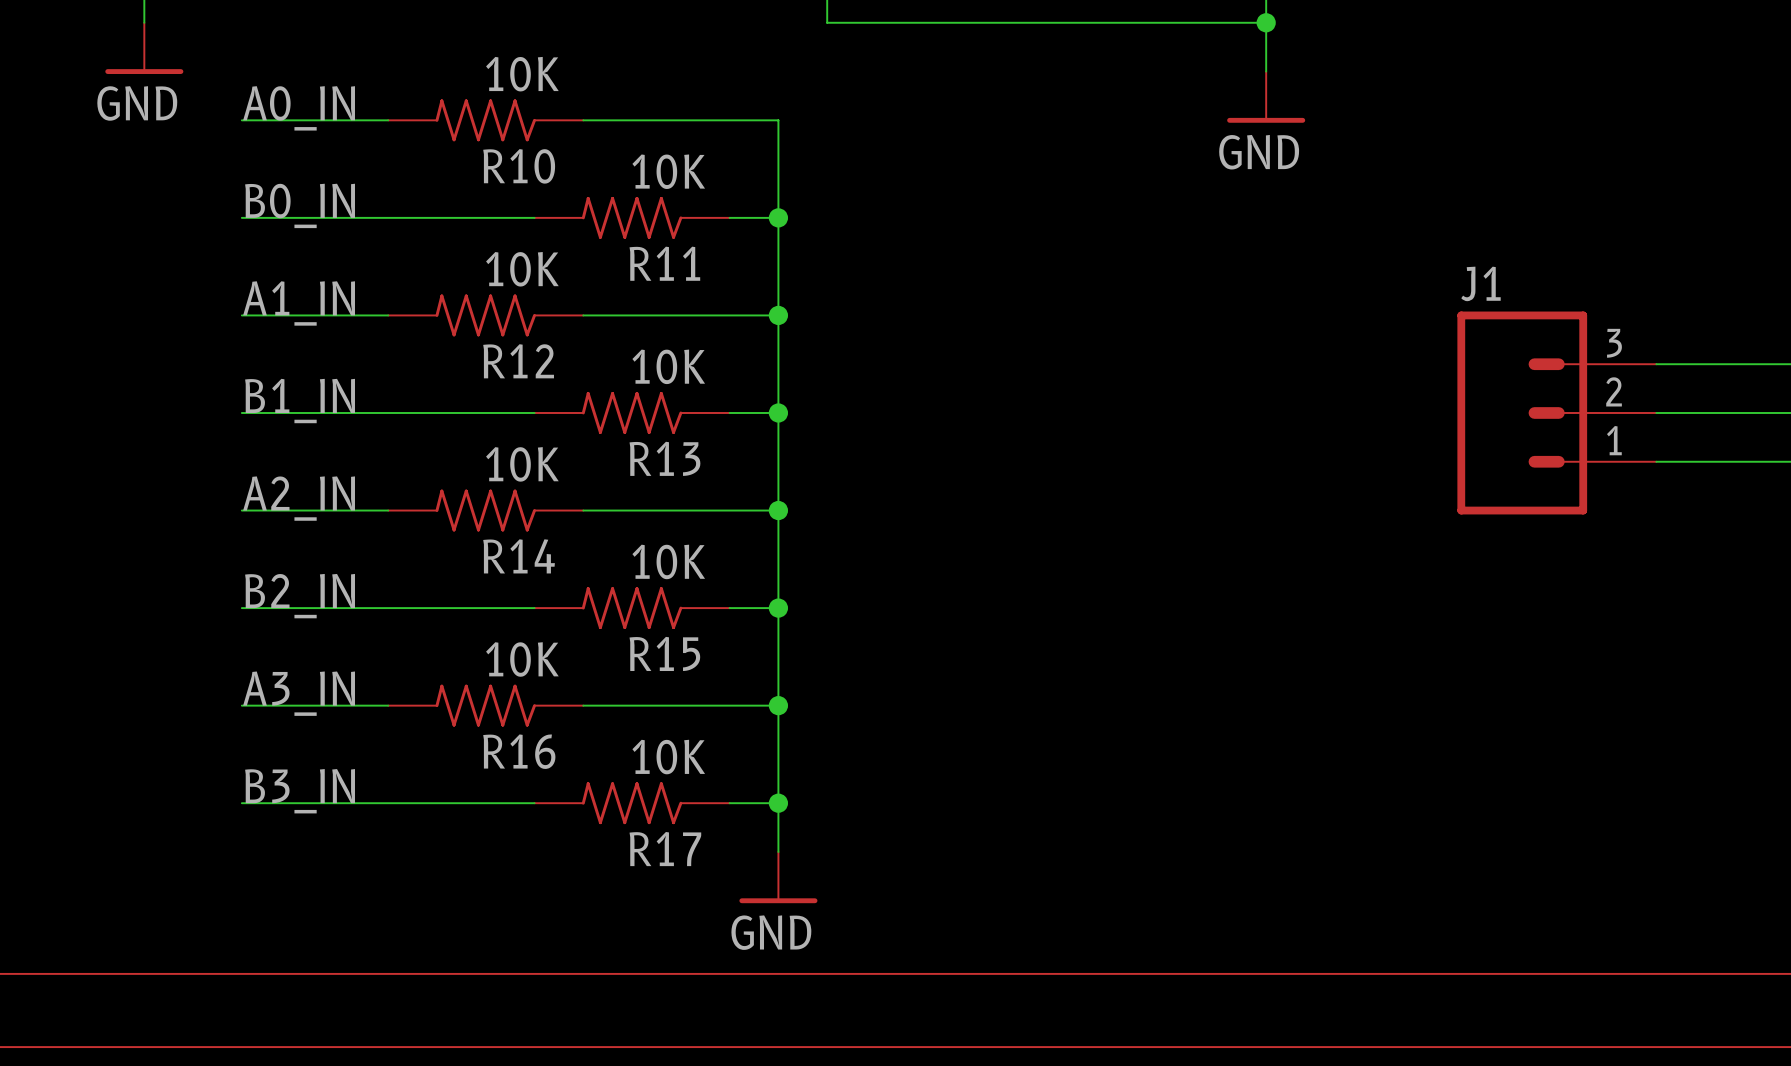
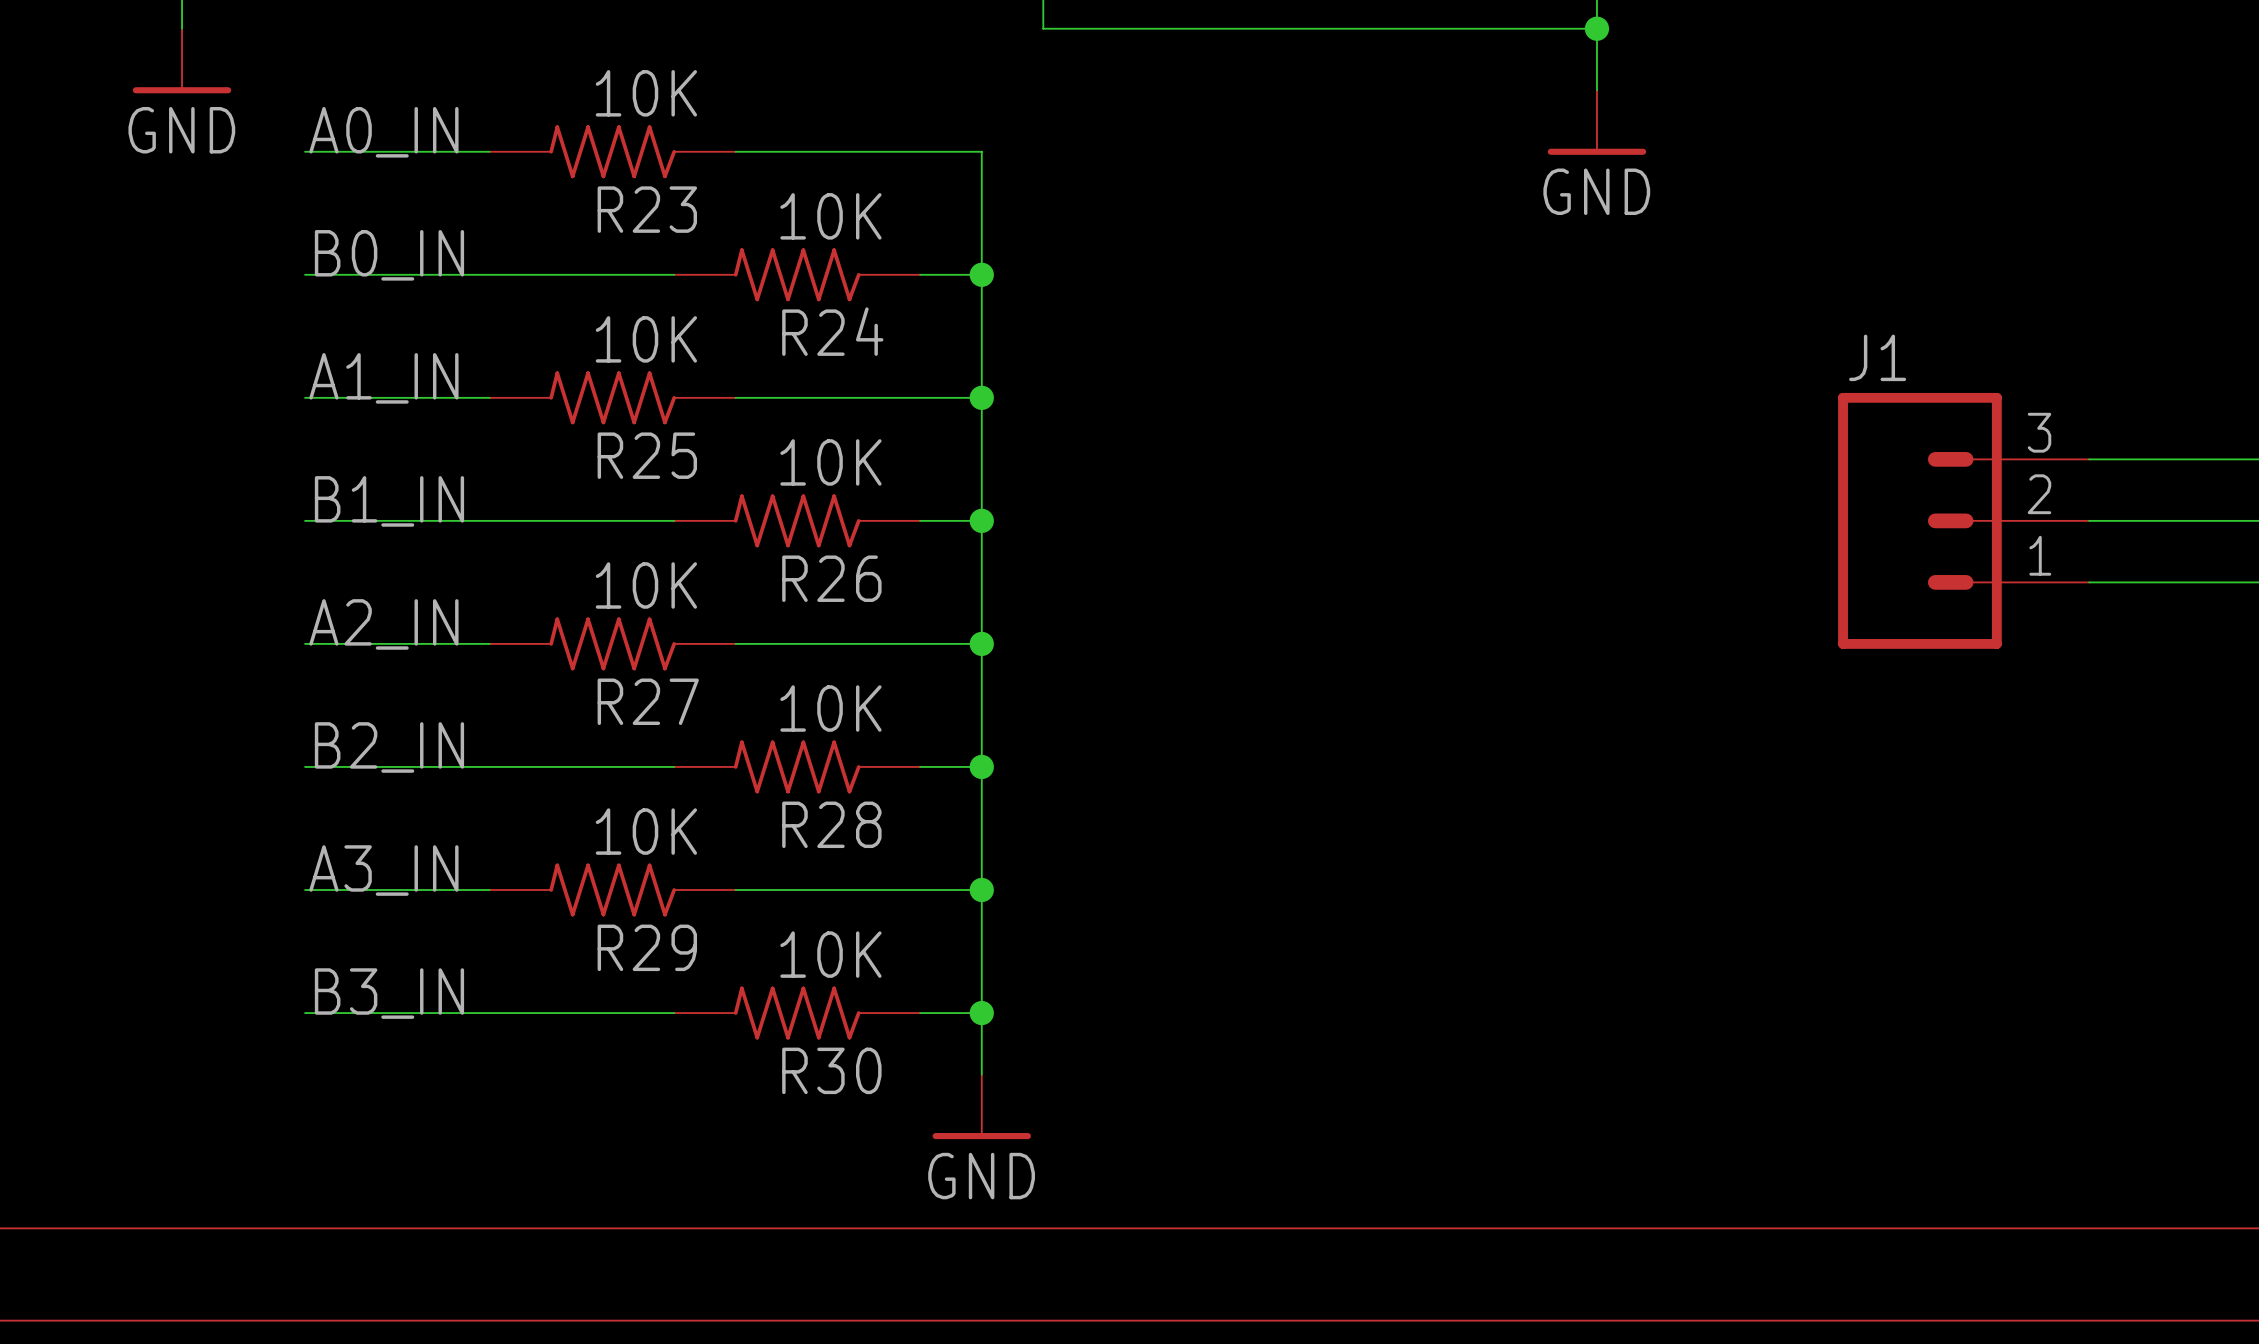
R10 name: R10 (519, 166) -> R23 (647, 209)
R11 name: R11 (664, 263) -> R24 (832, 331)
R12 name: R12 (518, 361) -> R25 (647, 455)
R13 name: R13 (664, 458) -> R26 (831, 578)
R14 name: R14 (519, 556) -> R27 (648, 701)
R15 name: R15 (664, 653) -> R28 (831, 824)
R16 name: R16 (519, 751) -> R29 (647, 947)
R17 name: R17 (665, 849) -> R30 (831, 1070)

